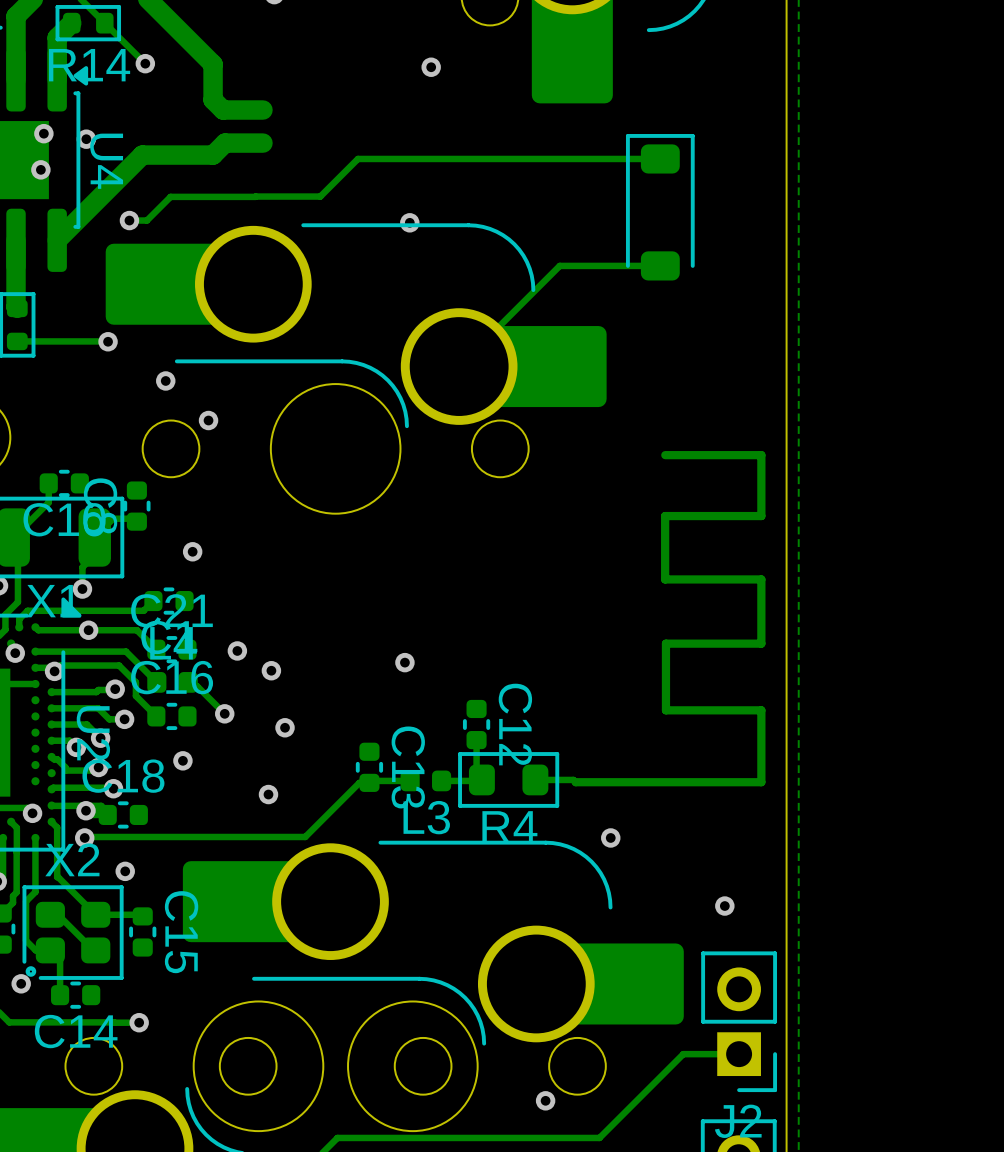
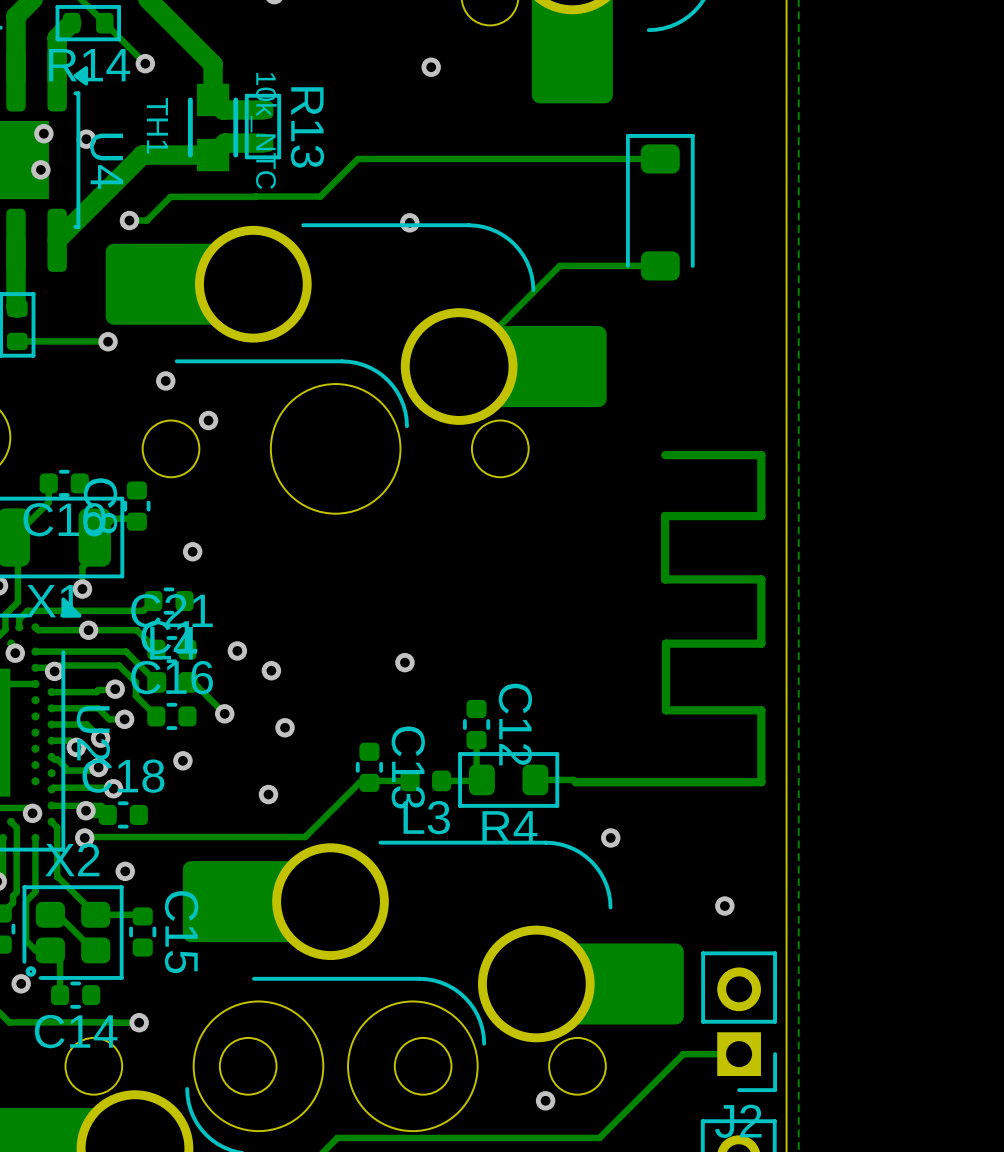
R13: none -> (262, 126)
TH1: none -> 10k_NTC (213, 127)

